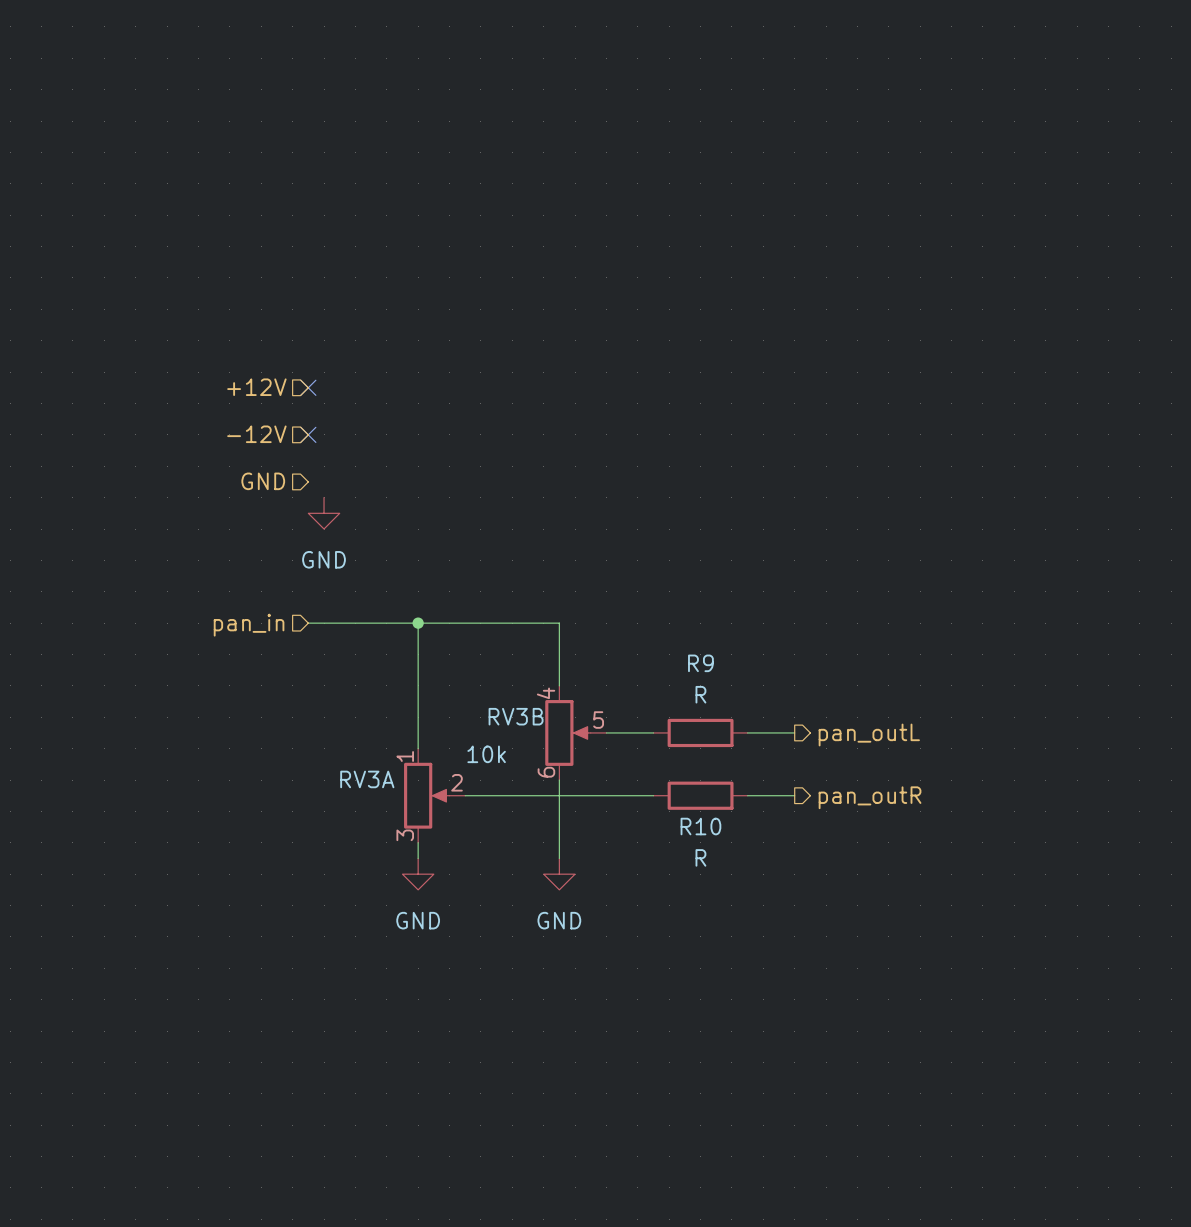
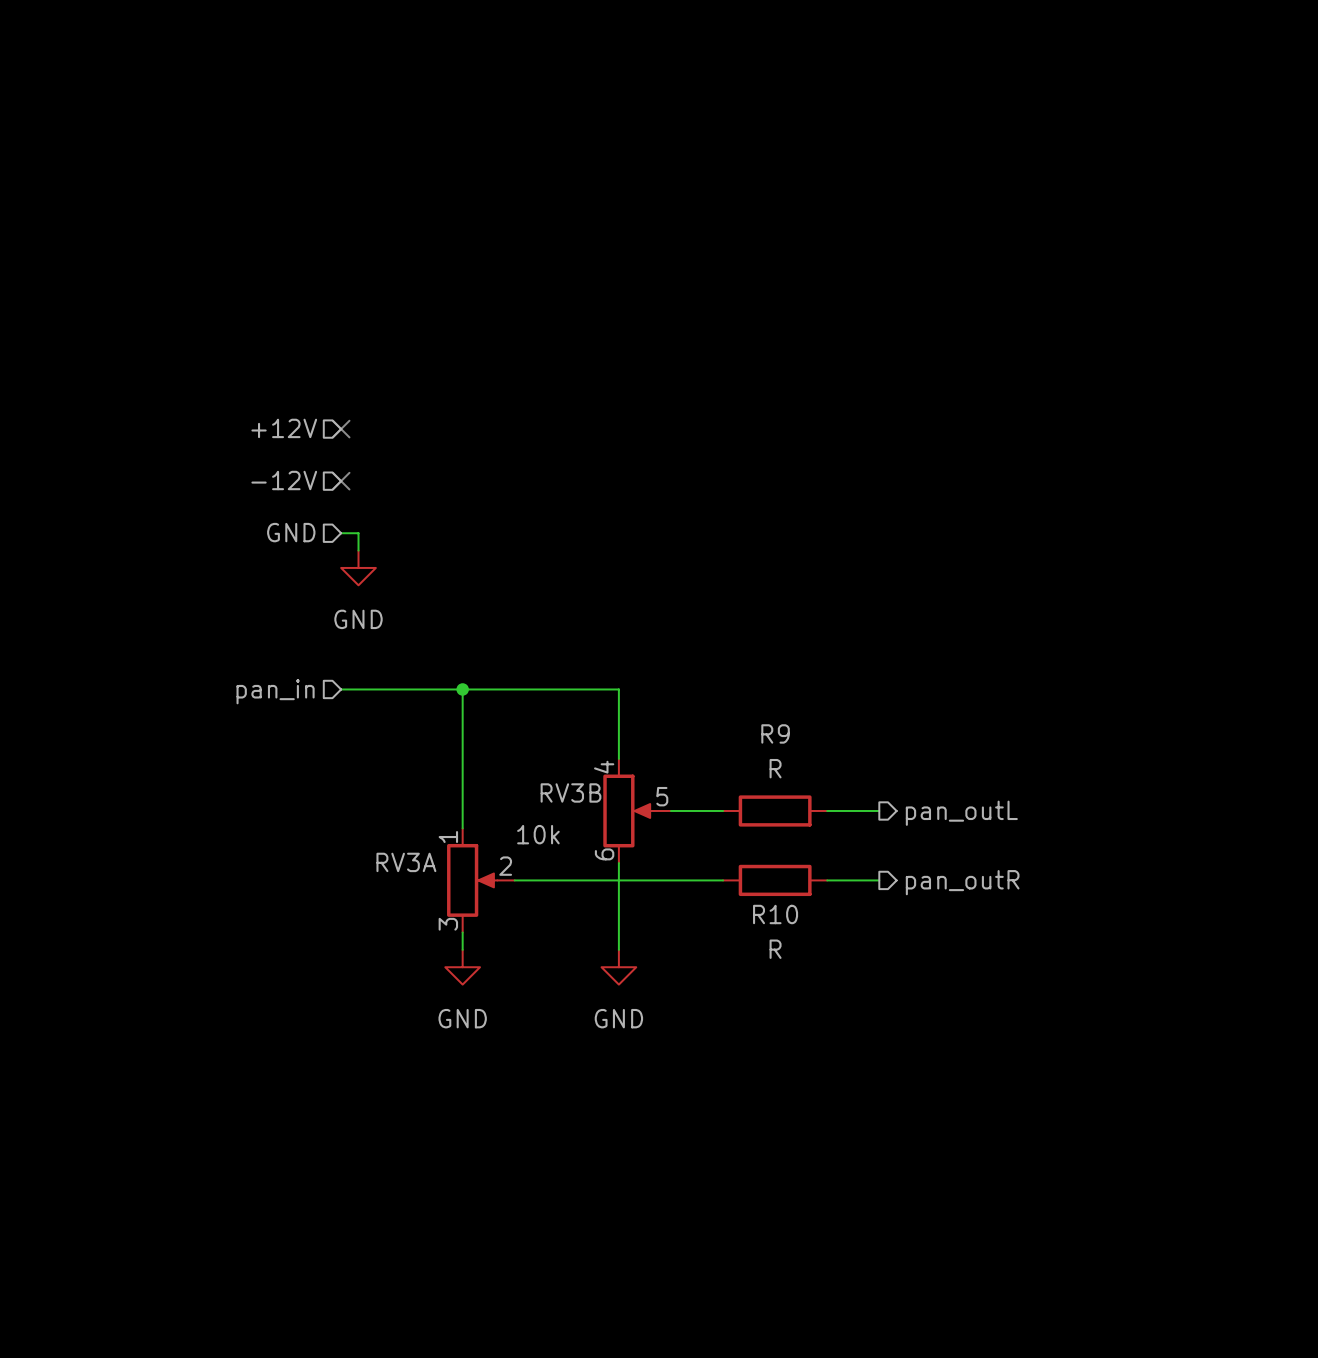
wire: none -> (341, 533) (358, 533) (358, 550)

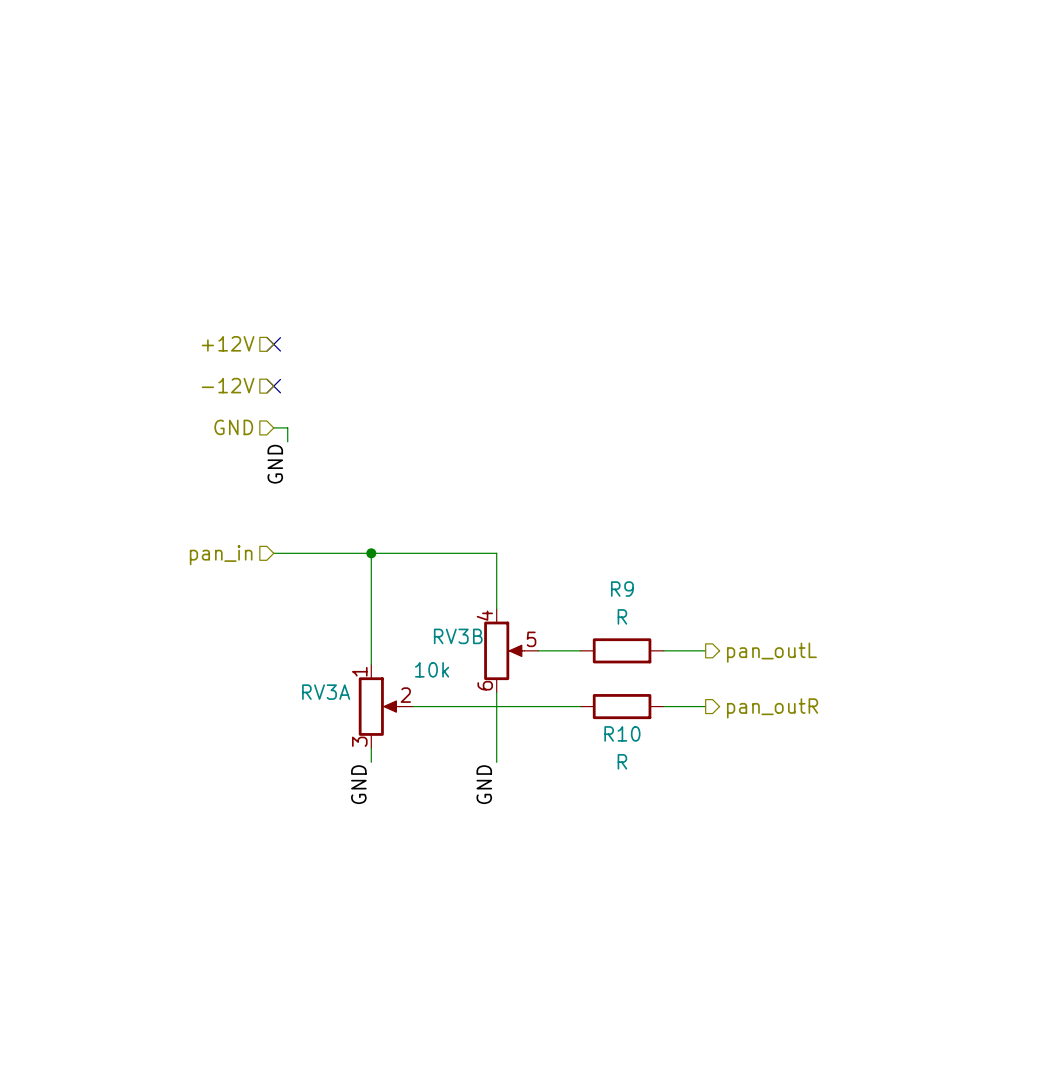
power symbol: GND (358, 567) -> none
label: none -> GND (275, 464)
power symbol: GND (462, 967) -> none
power symbol: GND (618, 967) -> none
label: none -> GND (358, 784)
label: none -> GND (484, 784)

